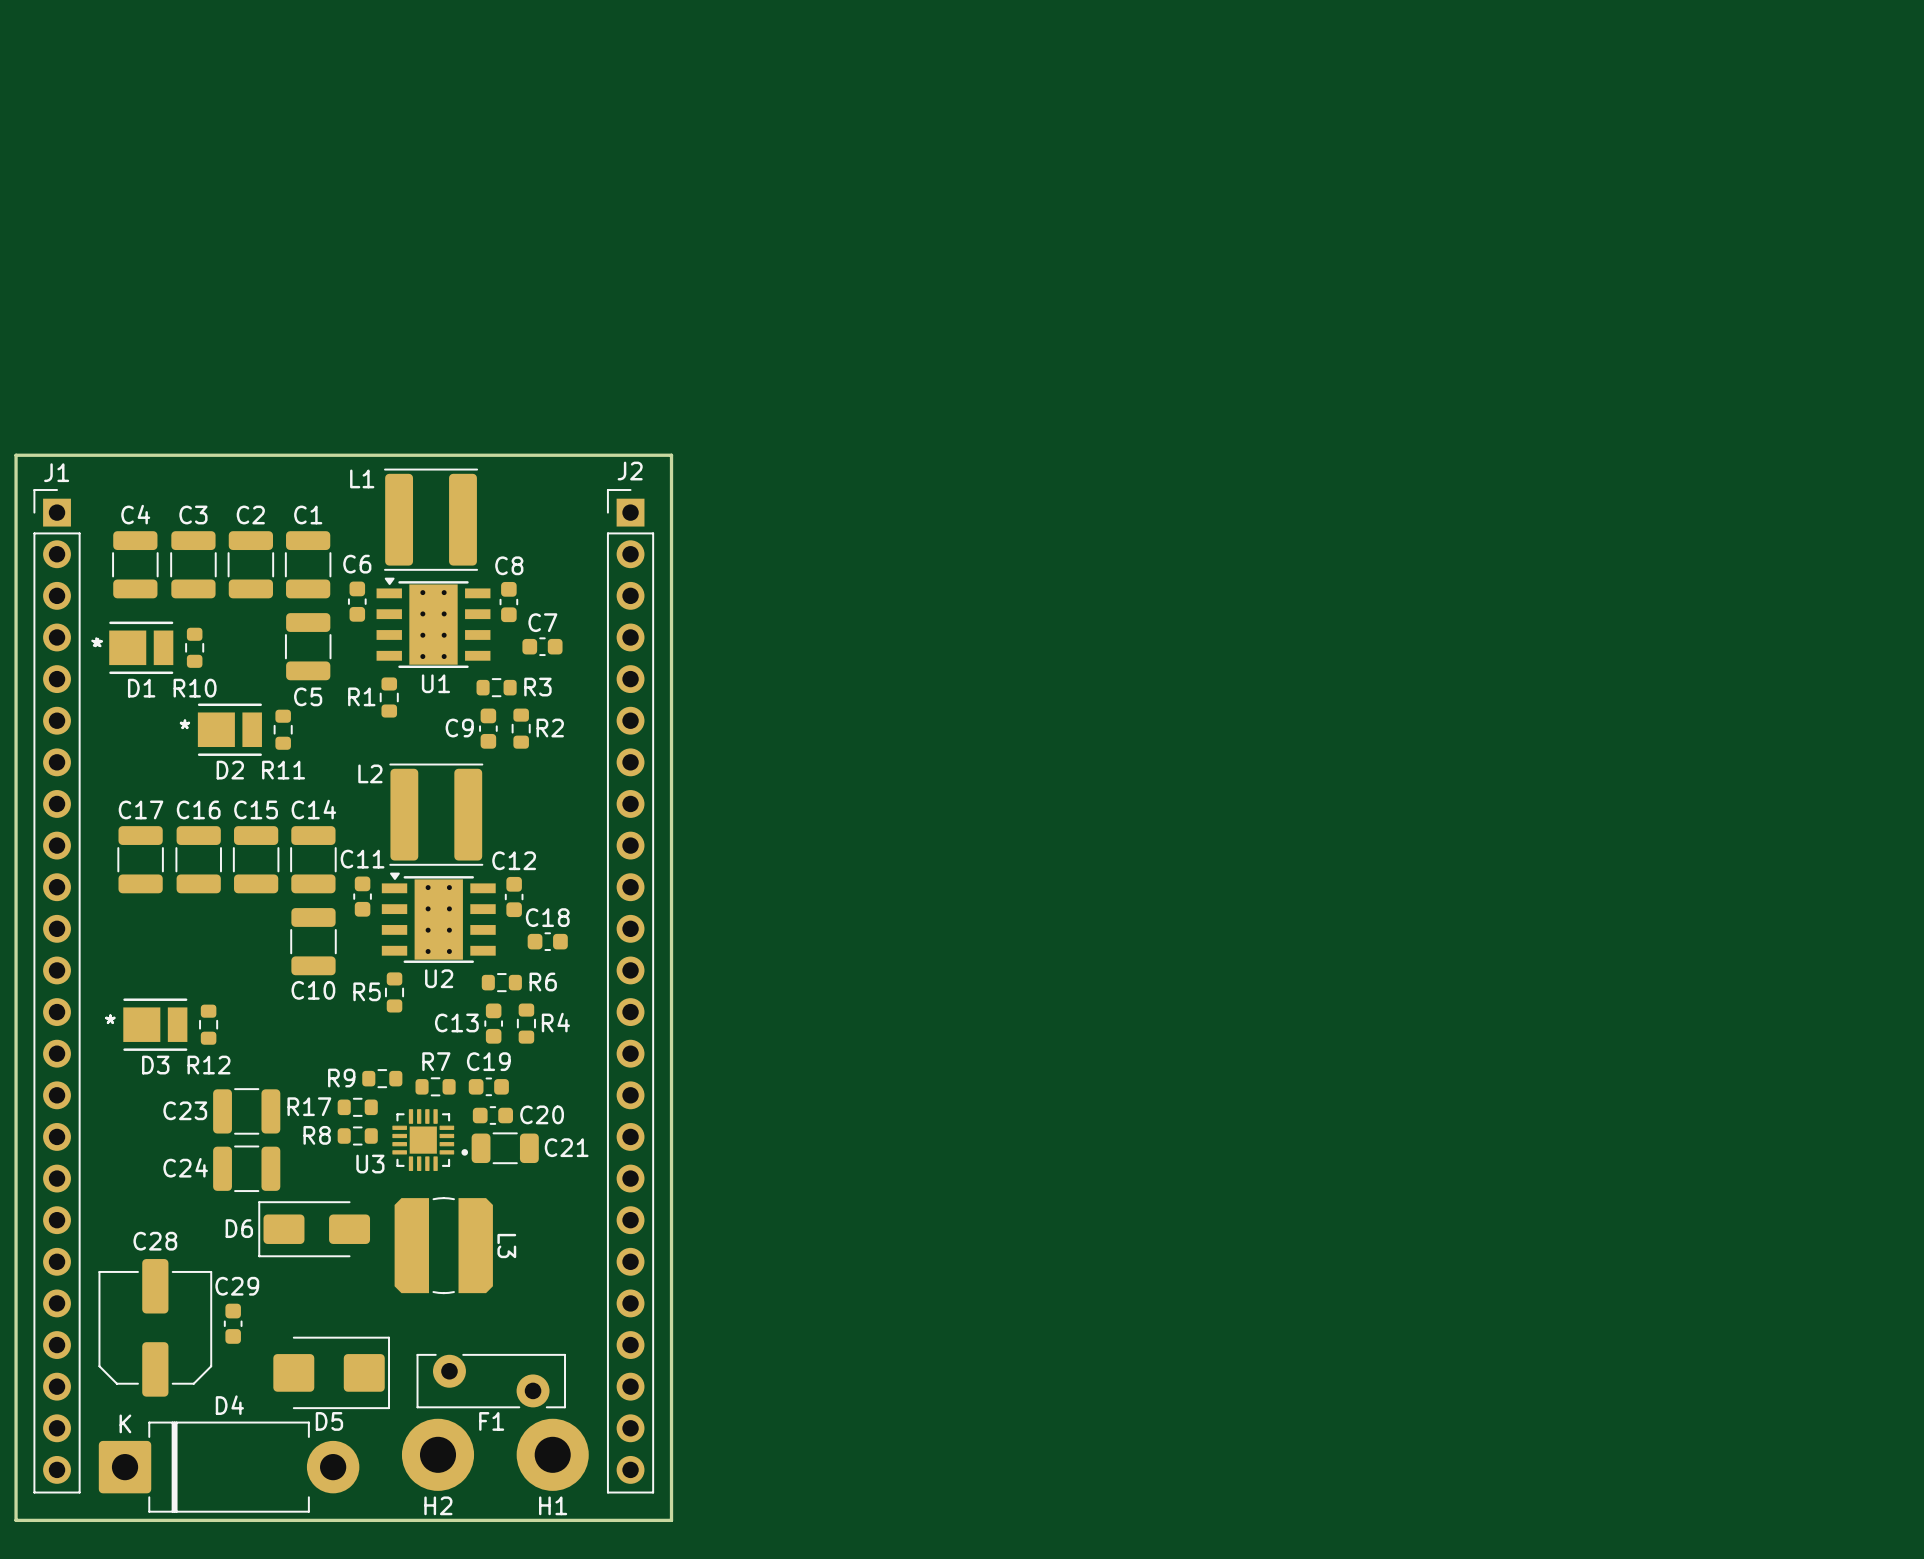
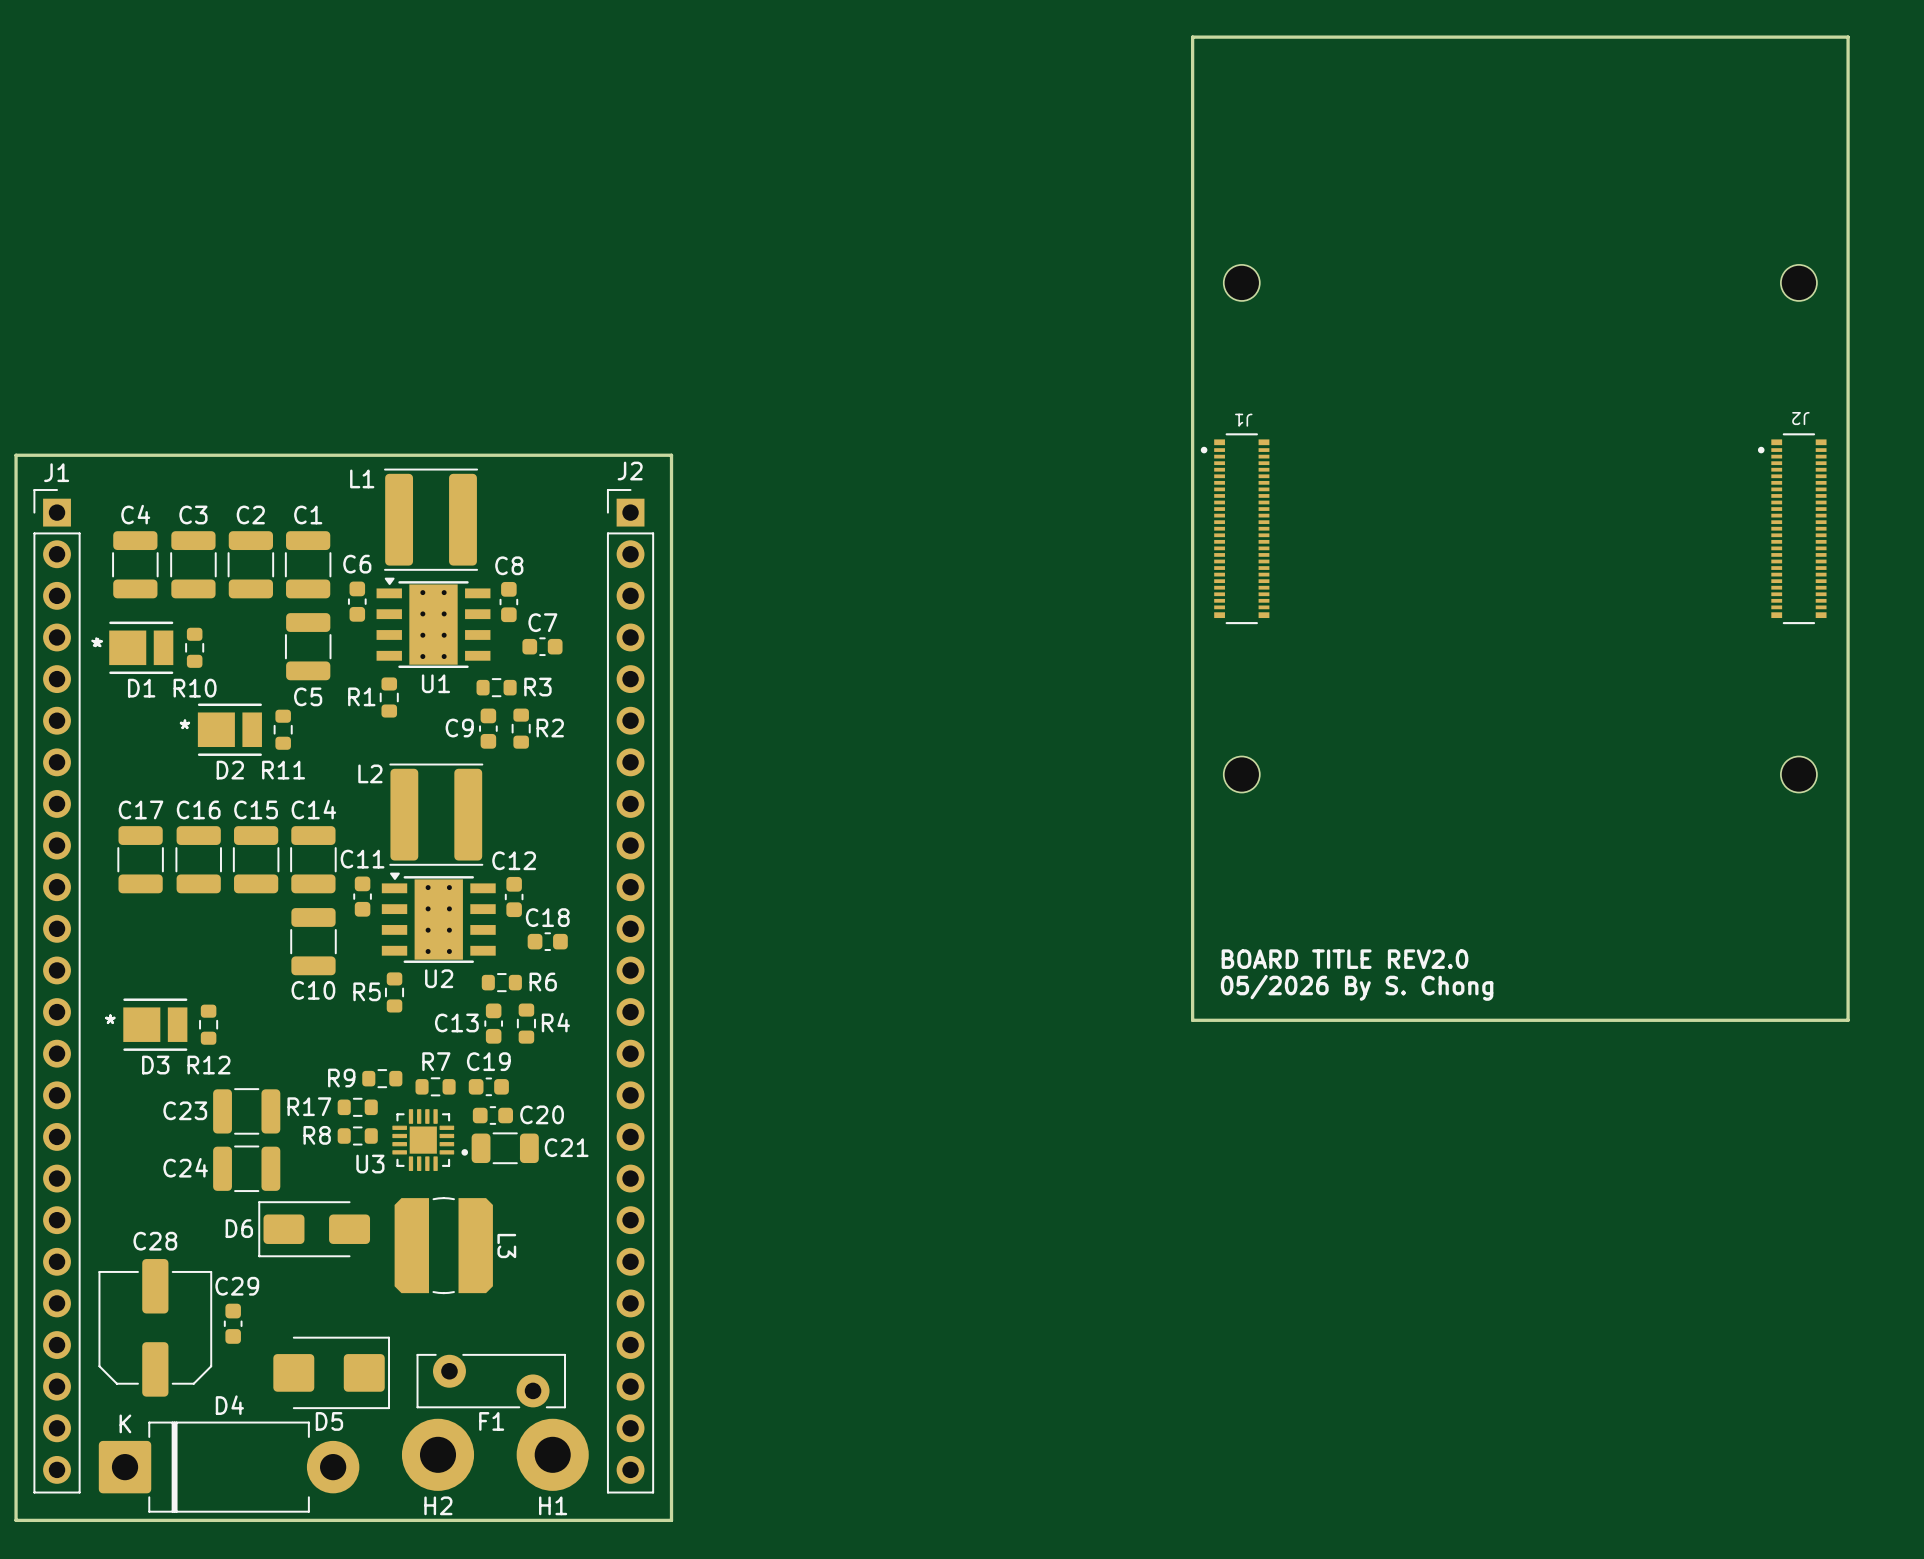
board edge: none -> (1192, 37) (1848, 37) (1848, 1020) (1192, 1020) (1192, 37)
part: none -> (1241, 282)
part: none -> (1798, 282)
J1: none -> (1235, 528)
J2: none -> (1792, 528)
part: none -> (1241, 774)
part: none -> (1798, 774)
text: none -> BOARD TITLE REV2.0 (1344, 959)
text: none -> 05/2026 By S. Chong (1357, 987)

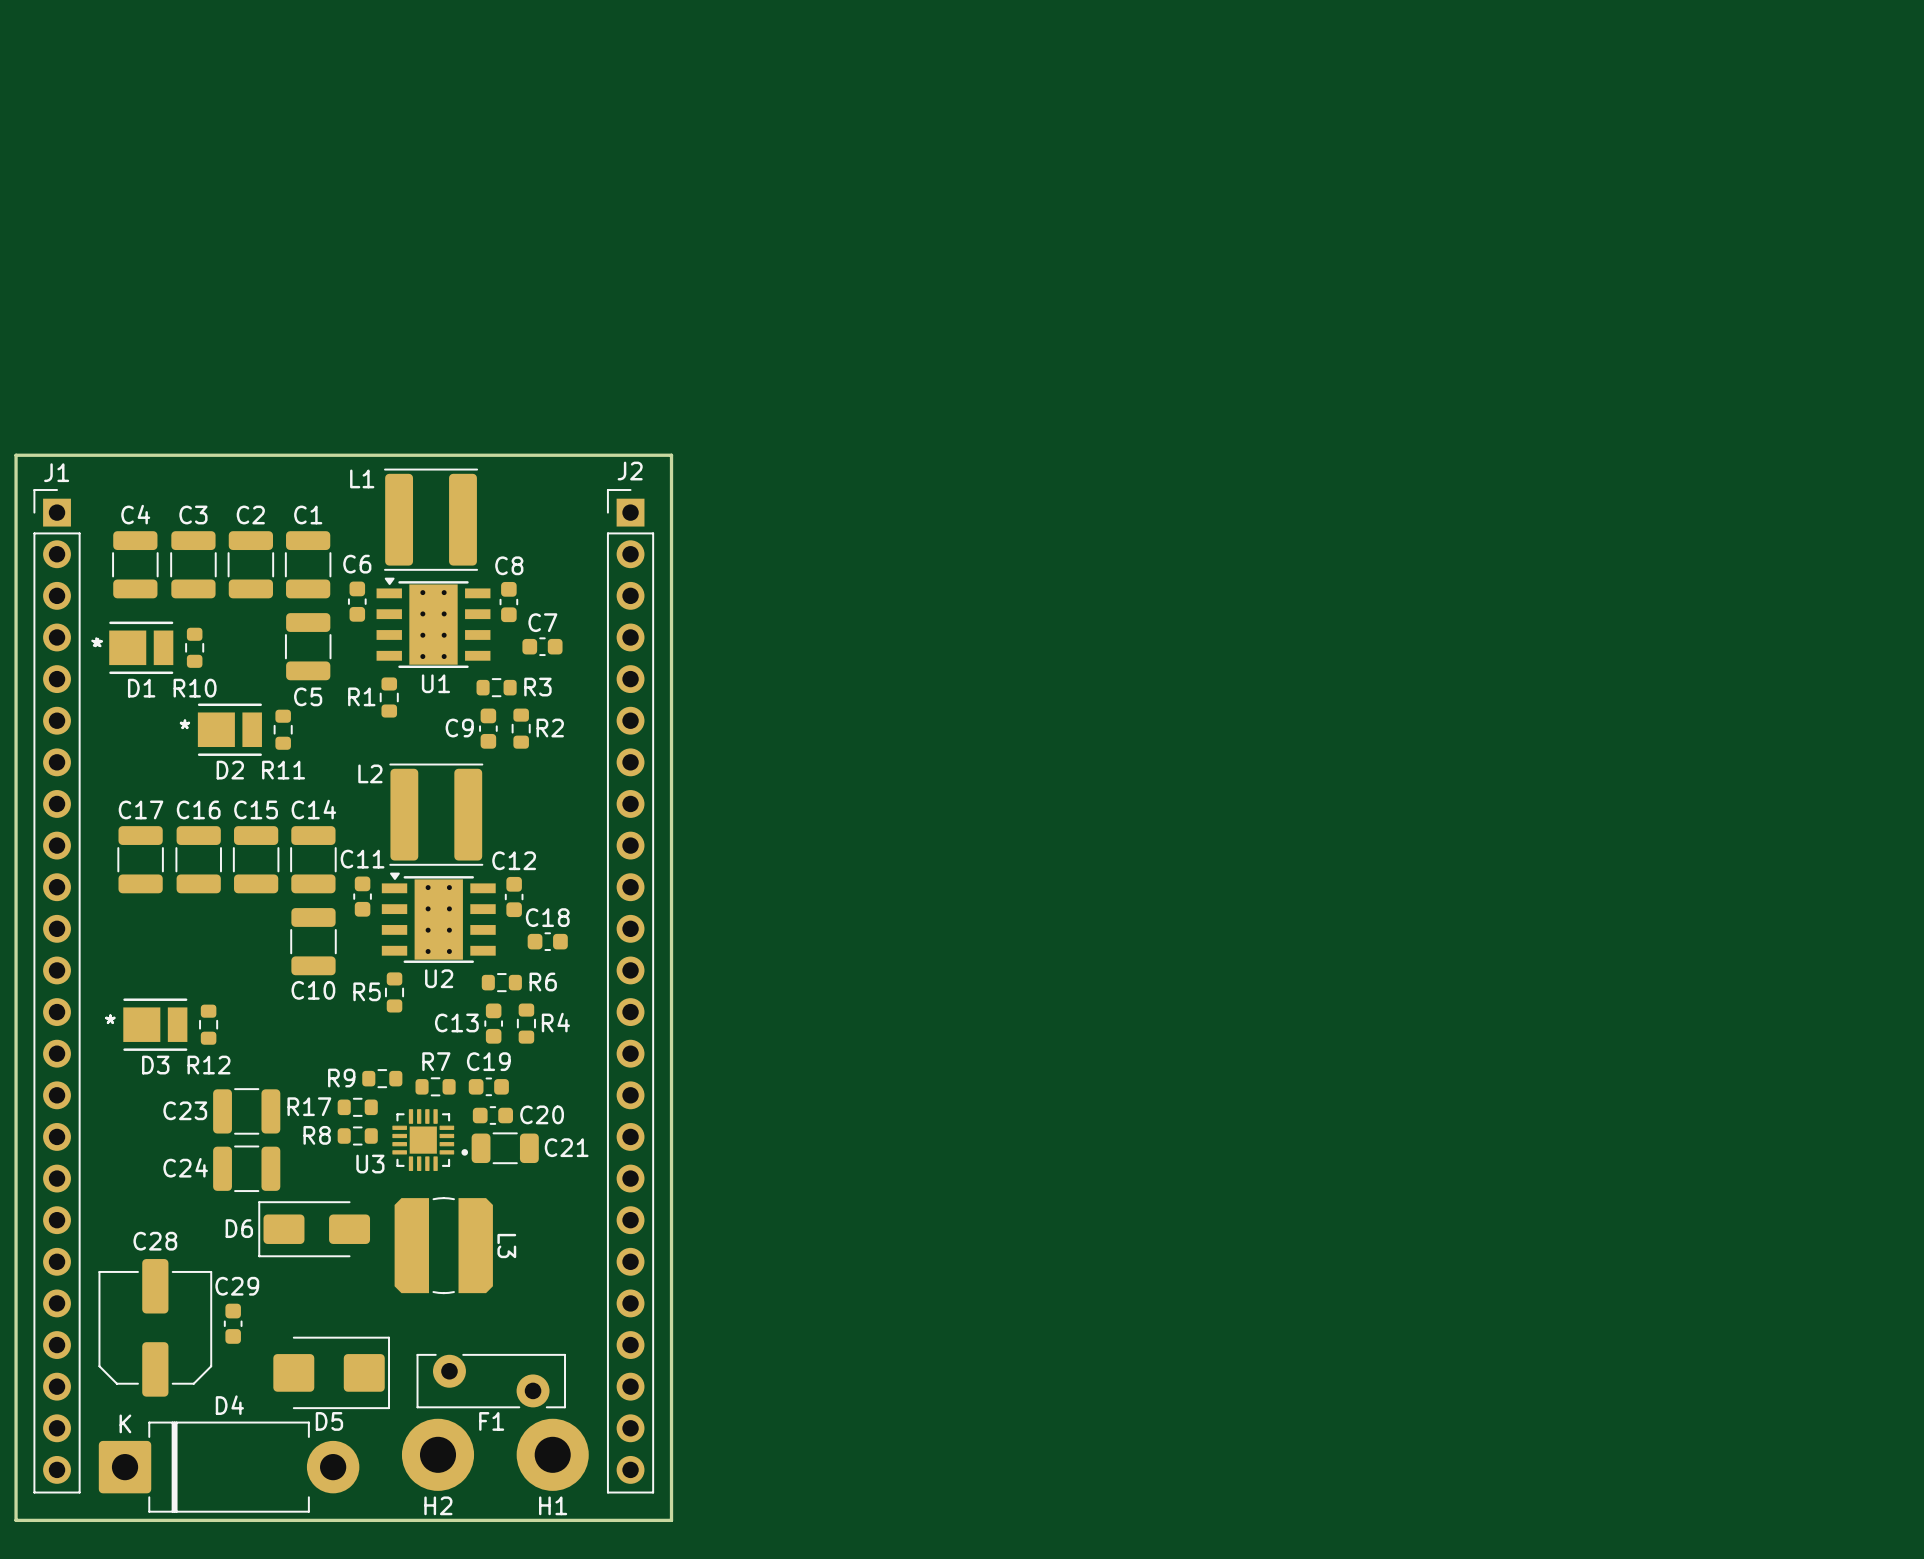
board edge: (1192, 37) (1848, 37) (1848, 1020) (1192, 1020) (1192, 37) -> none
part: (1241, 282) -> none
part: (1798, 282) -> none
J1: (1235, 528) -> none
J2: (1792, 528) -> none
part: (1241, 774) -> none
part: (1798, 774) -> none
text: BOARD TITLE REV2.0 (1344, 959) -> none
text: 05/2026 By S. Chong (1357, 987) -> none

